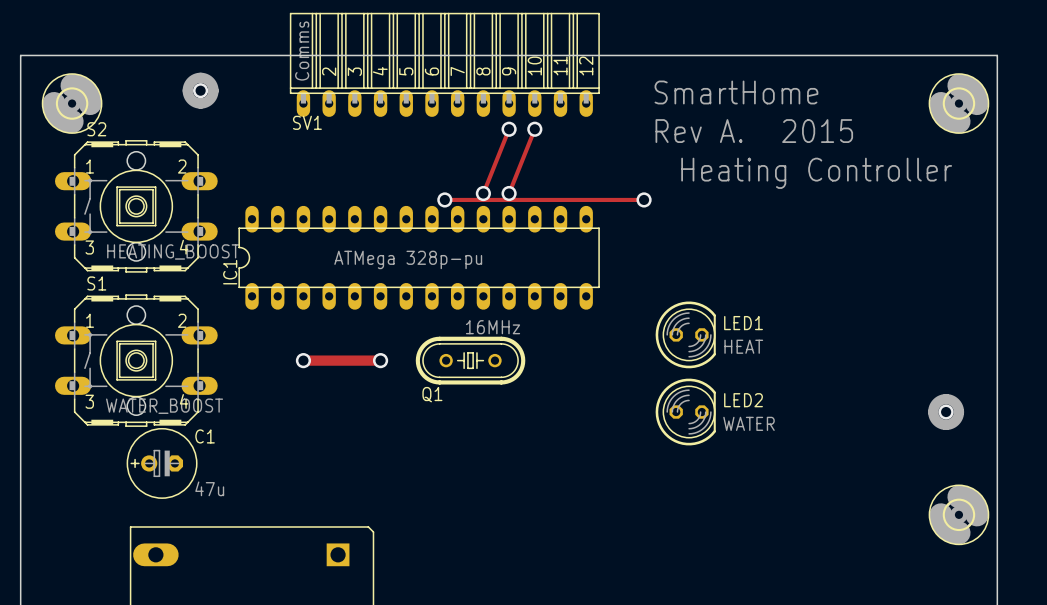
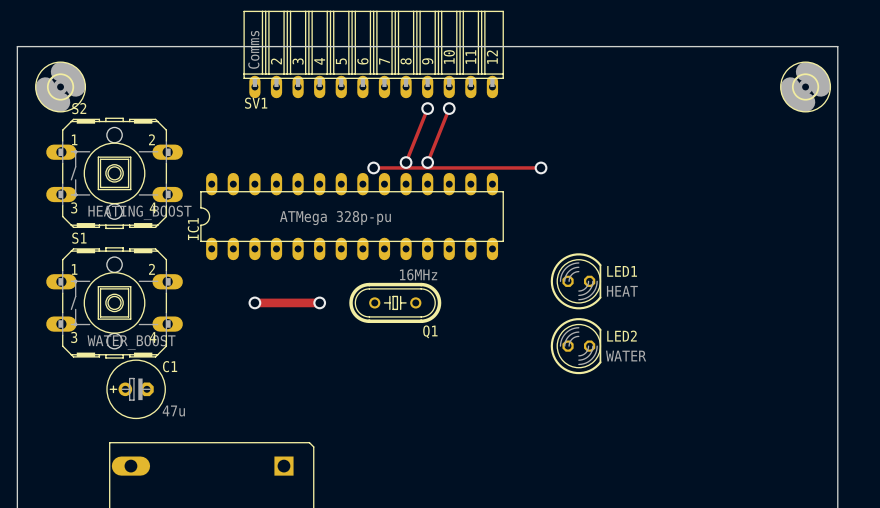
line: (200, 77) (209, 81) (213, 90) (209, 99) (200, 103) (191, 99) (187, 90) (191, 81) (200, 77) -> none
via: (200, 90) -> none
text: SmartHome (736, 92) -> none
text: Rev A. (699, 131) -> none
text: 2015 (817, 131) -> none
text: Heating Controller (816, 173) -> none
Q1 name position: Q1 (432, 394) -> Q1 (430, 331)
line: (946, 399) (955, 402) (958, 412) (955, 421) (946, 424) (937, 421) (933, 412) (937, 402) (946, 399) -> none
via: (946, 412) -> none
part: (958, 514) -> none

